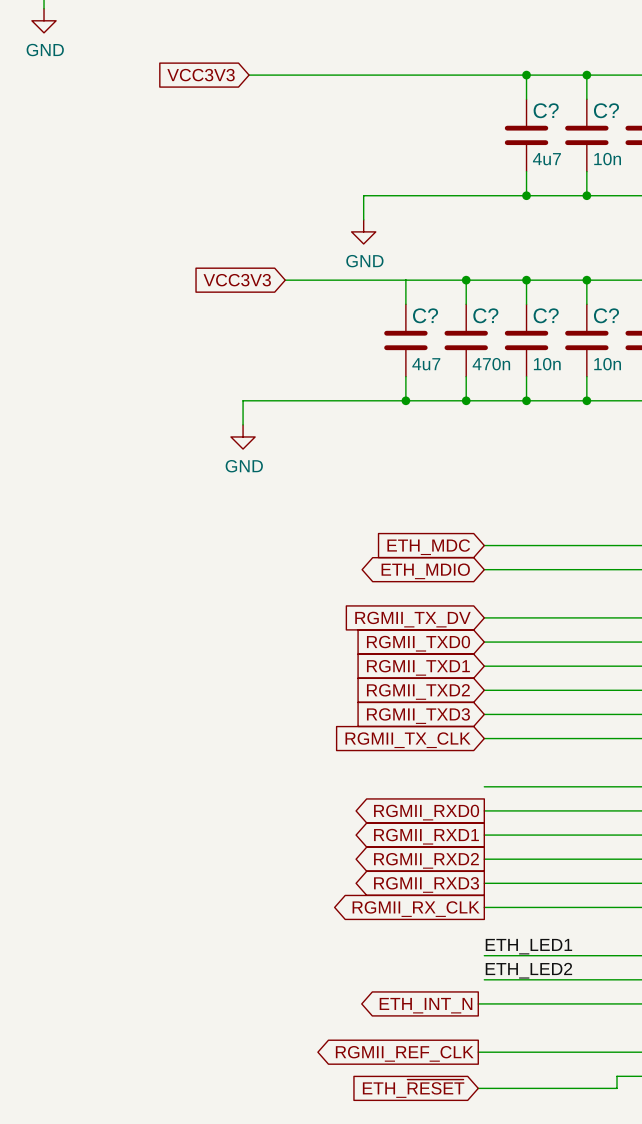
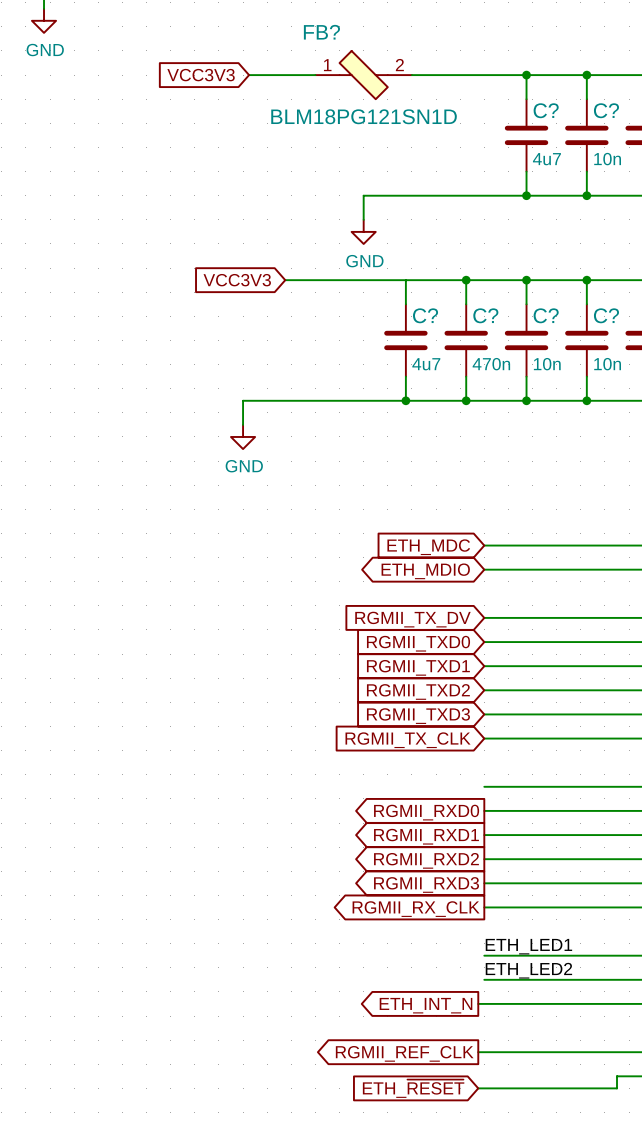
FB?: none -> BLM18PG121SN1D (363, 75)

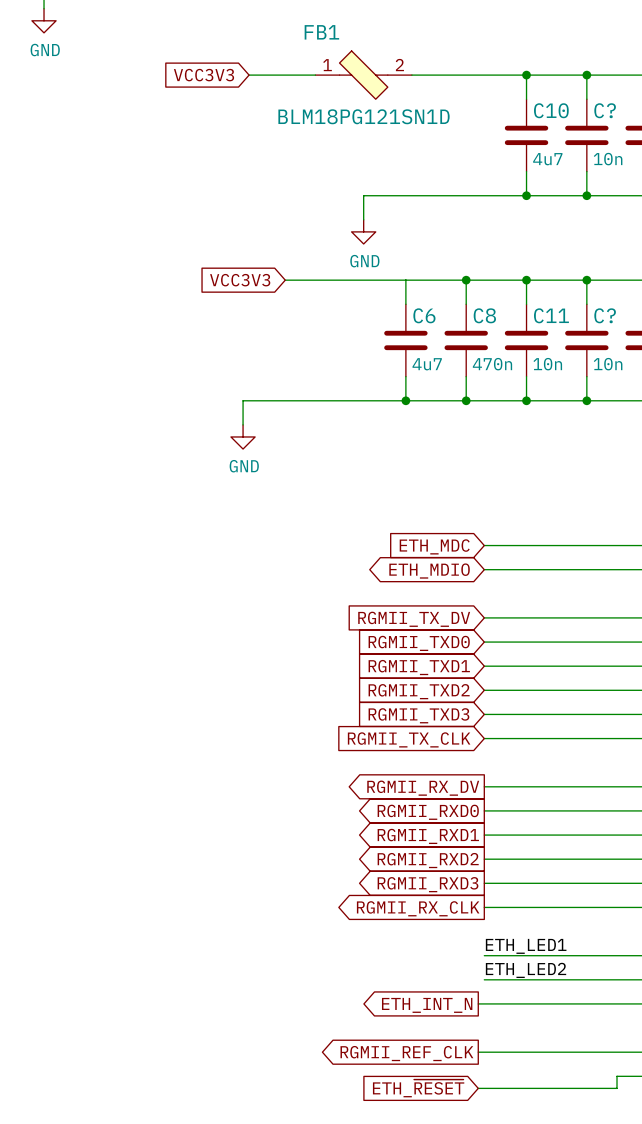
FB? name: FB? (321, 32) -> FB1 (321, 32)
C? name: C? (546, 110) -> C10 (551, 110)
C? name: C? (425, 315) -> C6 (424, 315)
C? name: C? (485, 315) -> C8 (484, 315)
C? name: C? (546, 315) -> C11 (551, 315)
global label: none -> RGMII_RX_DV (423, 788)

